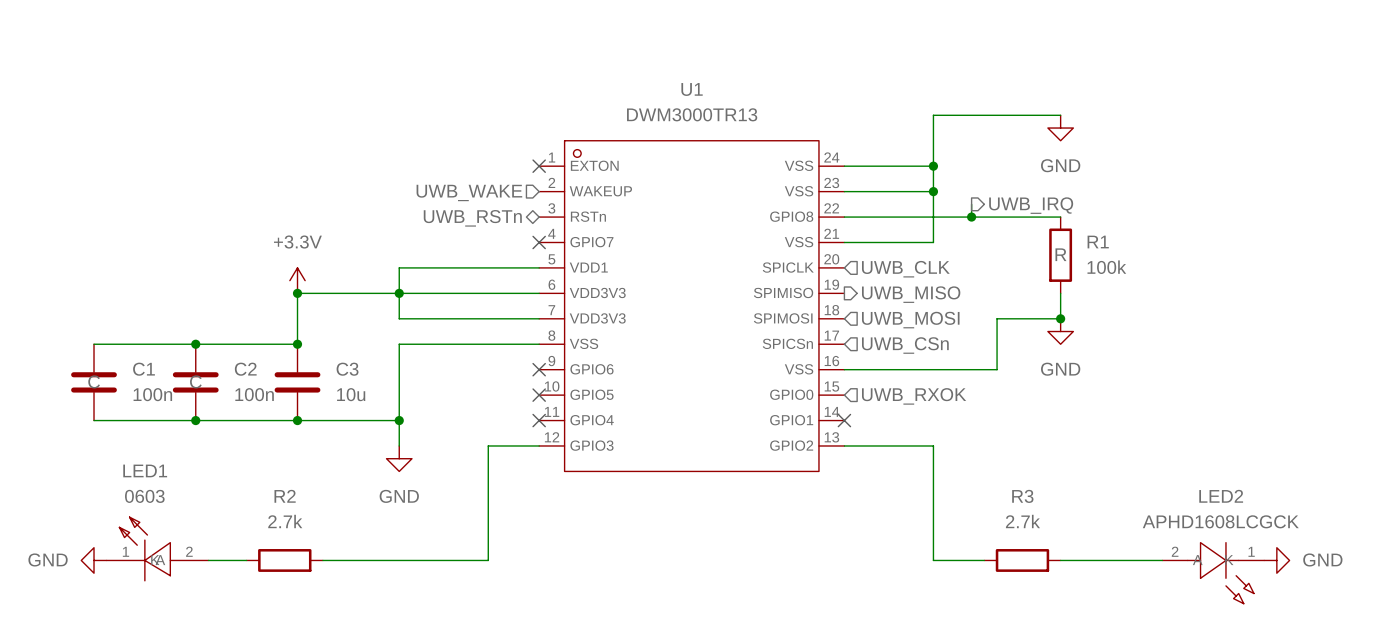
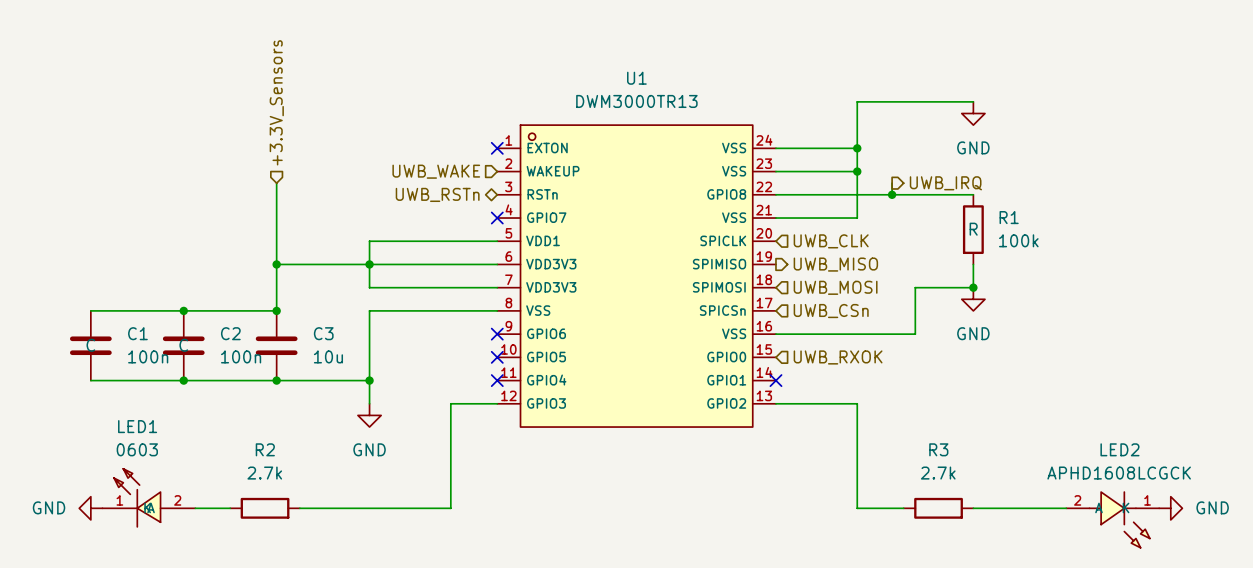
hierarchical label: none -> +3.3V_Sensors (276, 102)
wire: none -> (276, 183) (276, 264)
power symbol: +3.3V (297, 280) -> none

